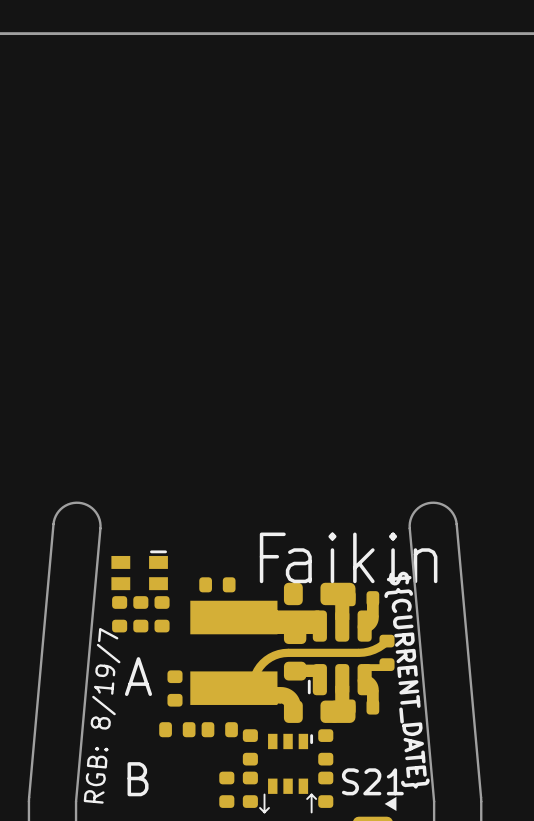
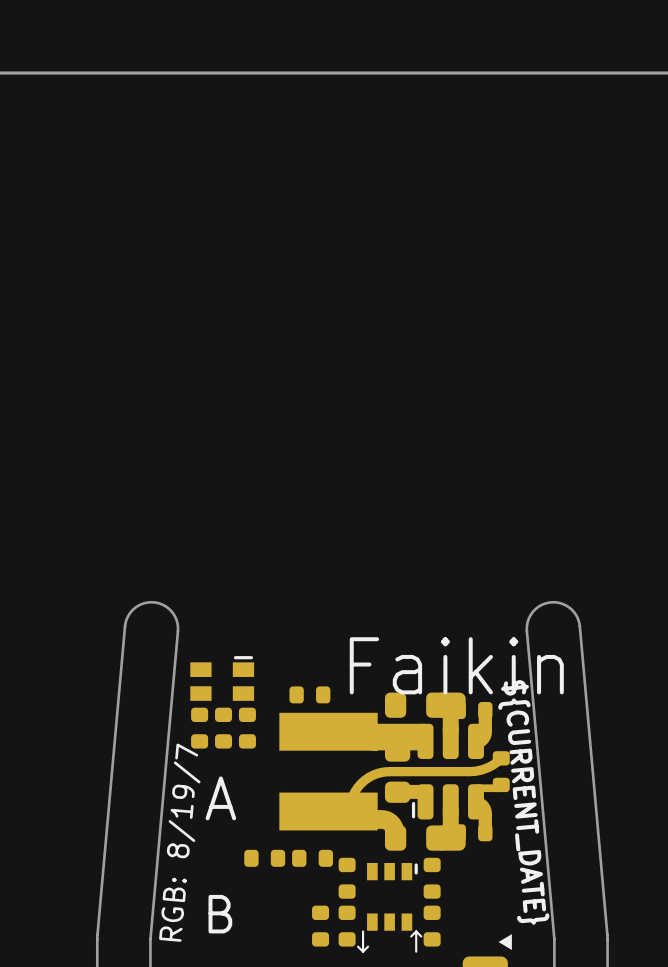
text: F (272, 557) -> Faikin (456, 665)
text: aikin (361, 557) -> none
part: (174, 688) -> none
text: S21 (372, 781) -> none

